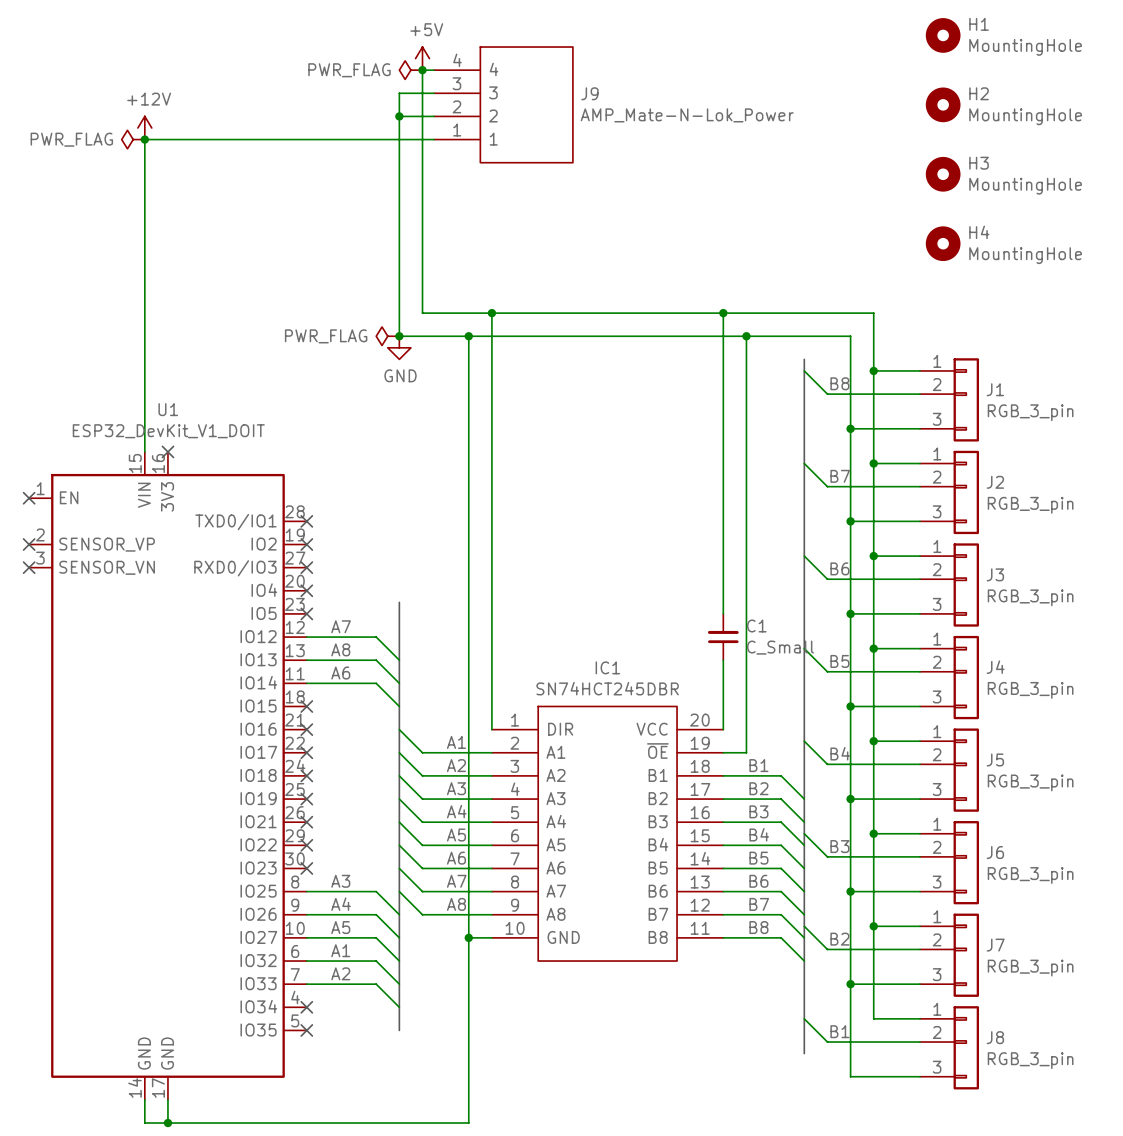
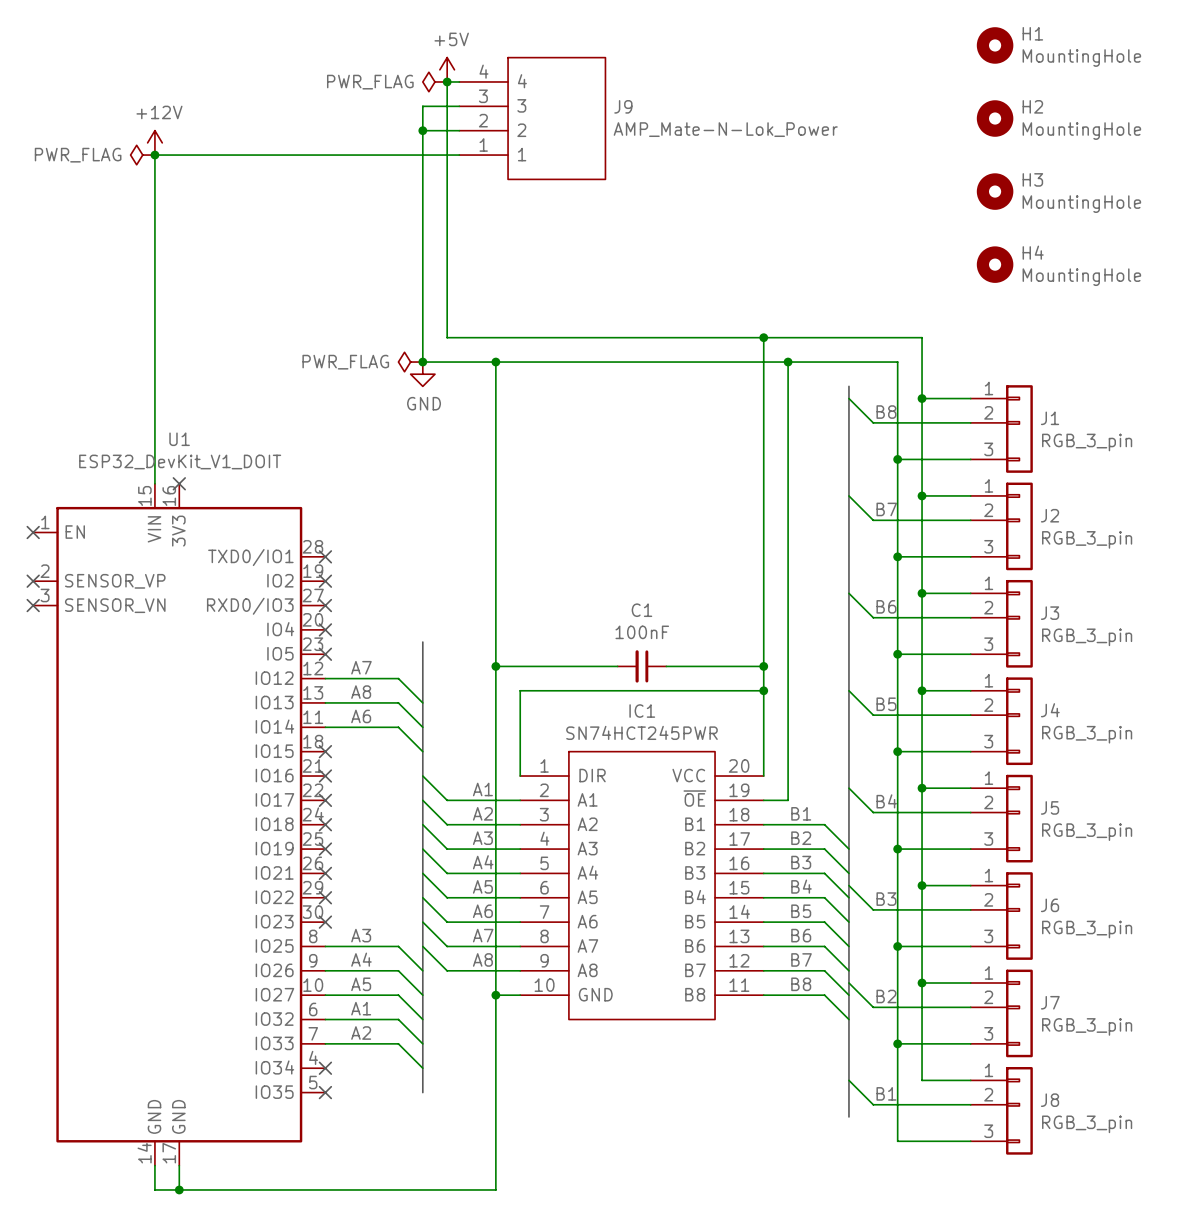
wire: (491, 313) (491, 648) -> (763, 690) (520, 690)
junction: (491, 313) -> none
wire: none -> (495, 666) (617, 666)
junction: none -> (495, 666)
wire: none -> (666, 666) (763, 666)
junction: none -> (763, 666)
C1 name position: C1 (756, 625) -> C1 (641, 610)
C1 rotation: 0° (723, 637) -> 90° counterclockwise (641, 666)
C1 position: (723, 637) -> (641, 666)
C1 value: C_Small (780, 647) -> 100nF (642, 632)
junction: none -> (763, 690)
IC1 value: SN74HCT245DBR (607, 688) -> SN74HCT245PWR (641, 732)

